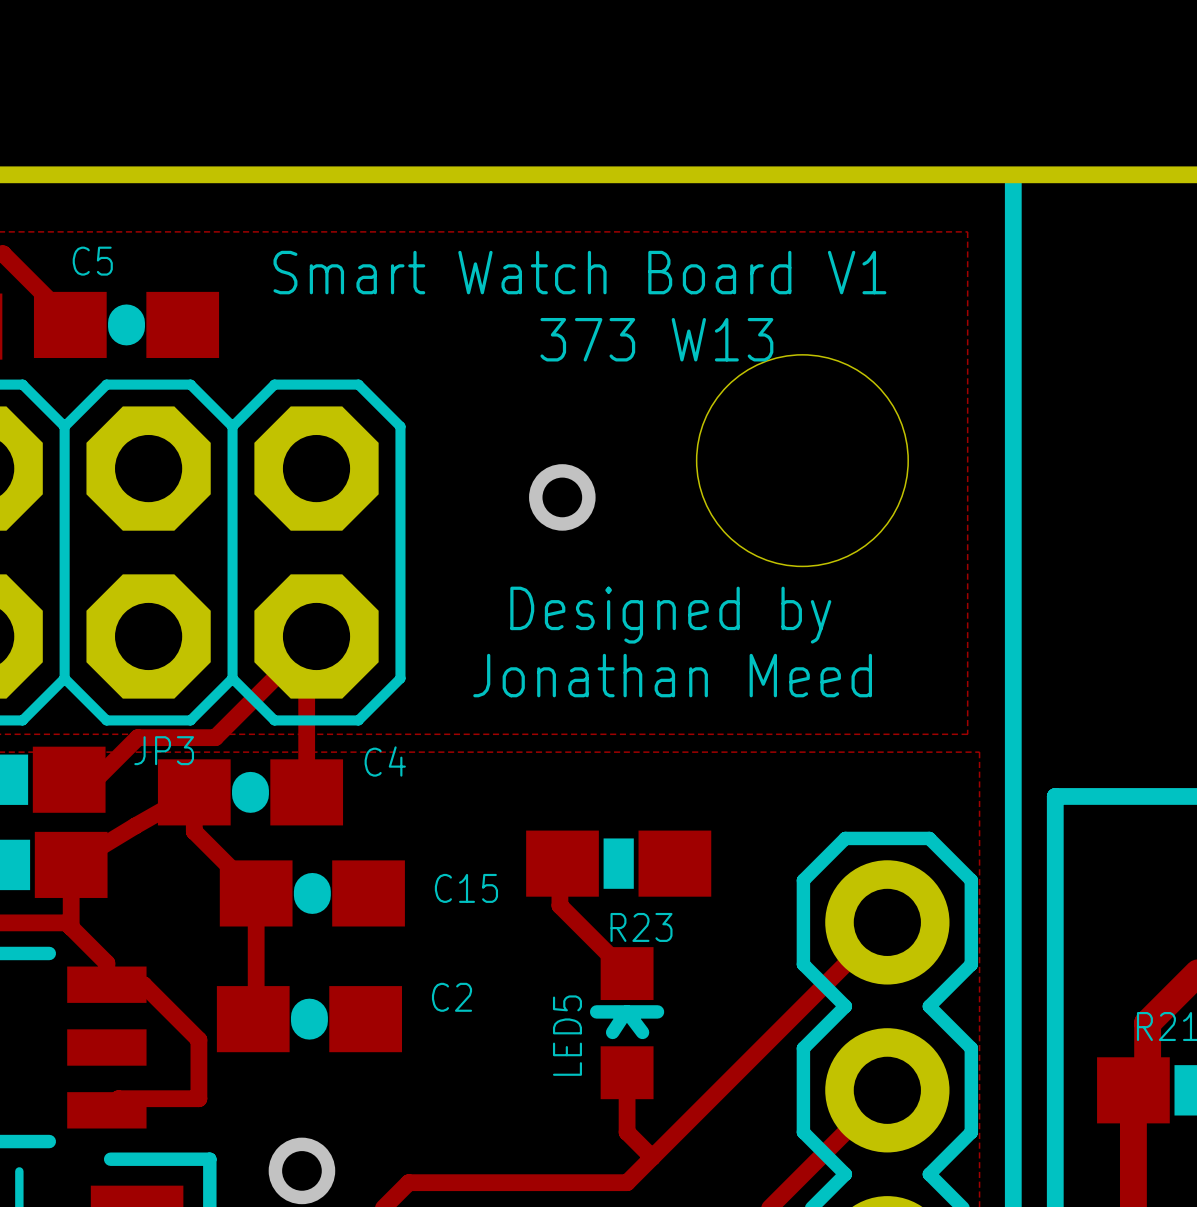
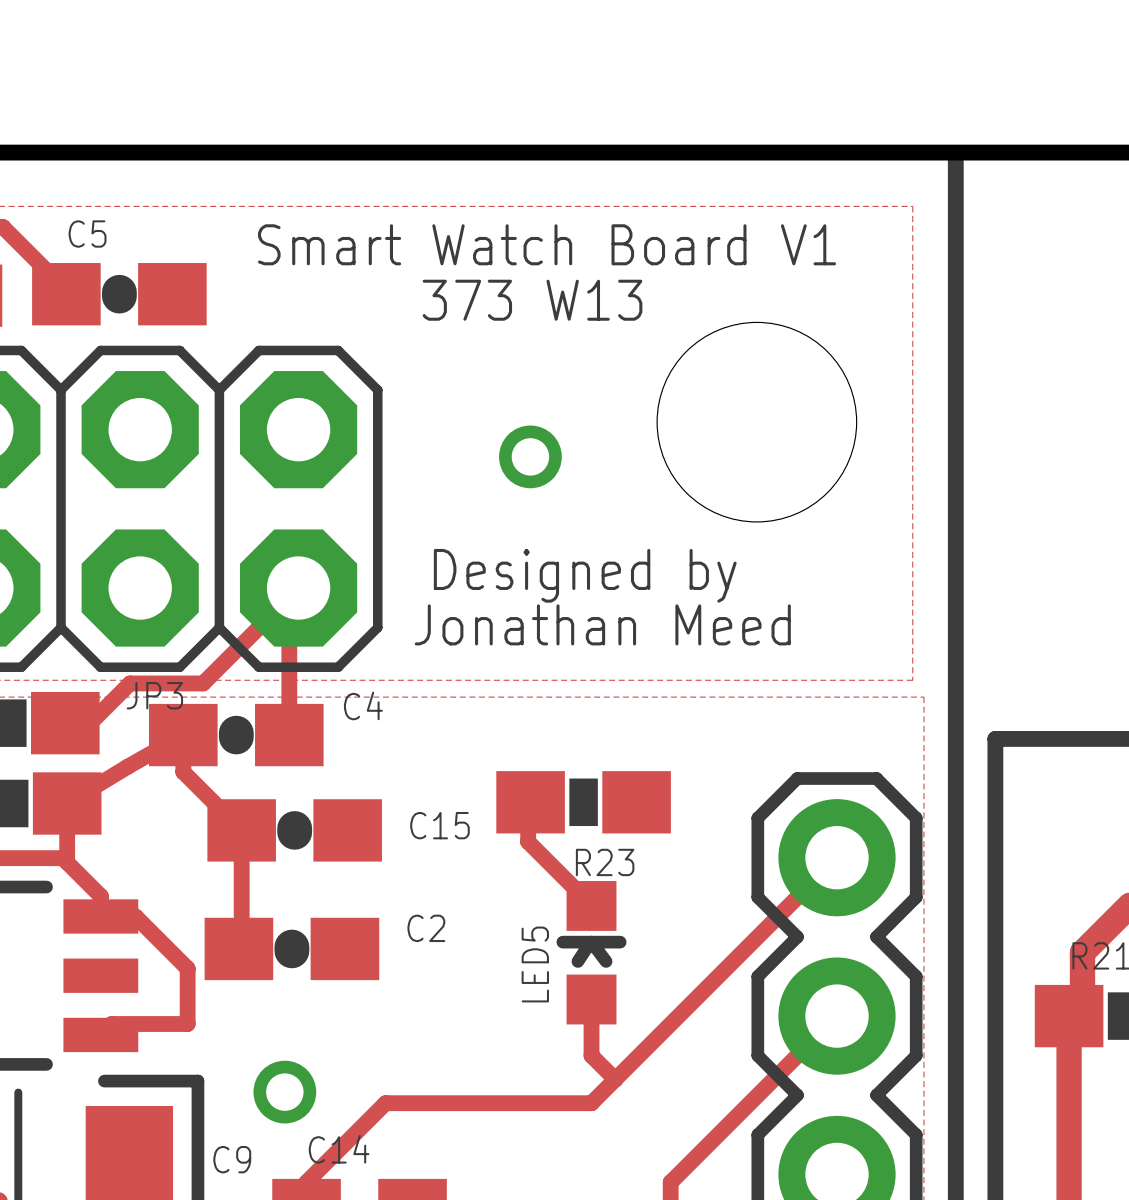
text position: 373 W13 (656, 339) -> 373 W13 (532, 300)
text position: Designed by (670, 615) -> Designed by (585, 575)
text position: Jonathan Meed (672, 675) -> Jonathan Meed (602, 624)

